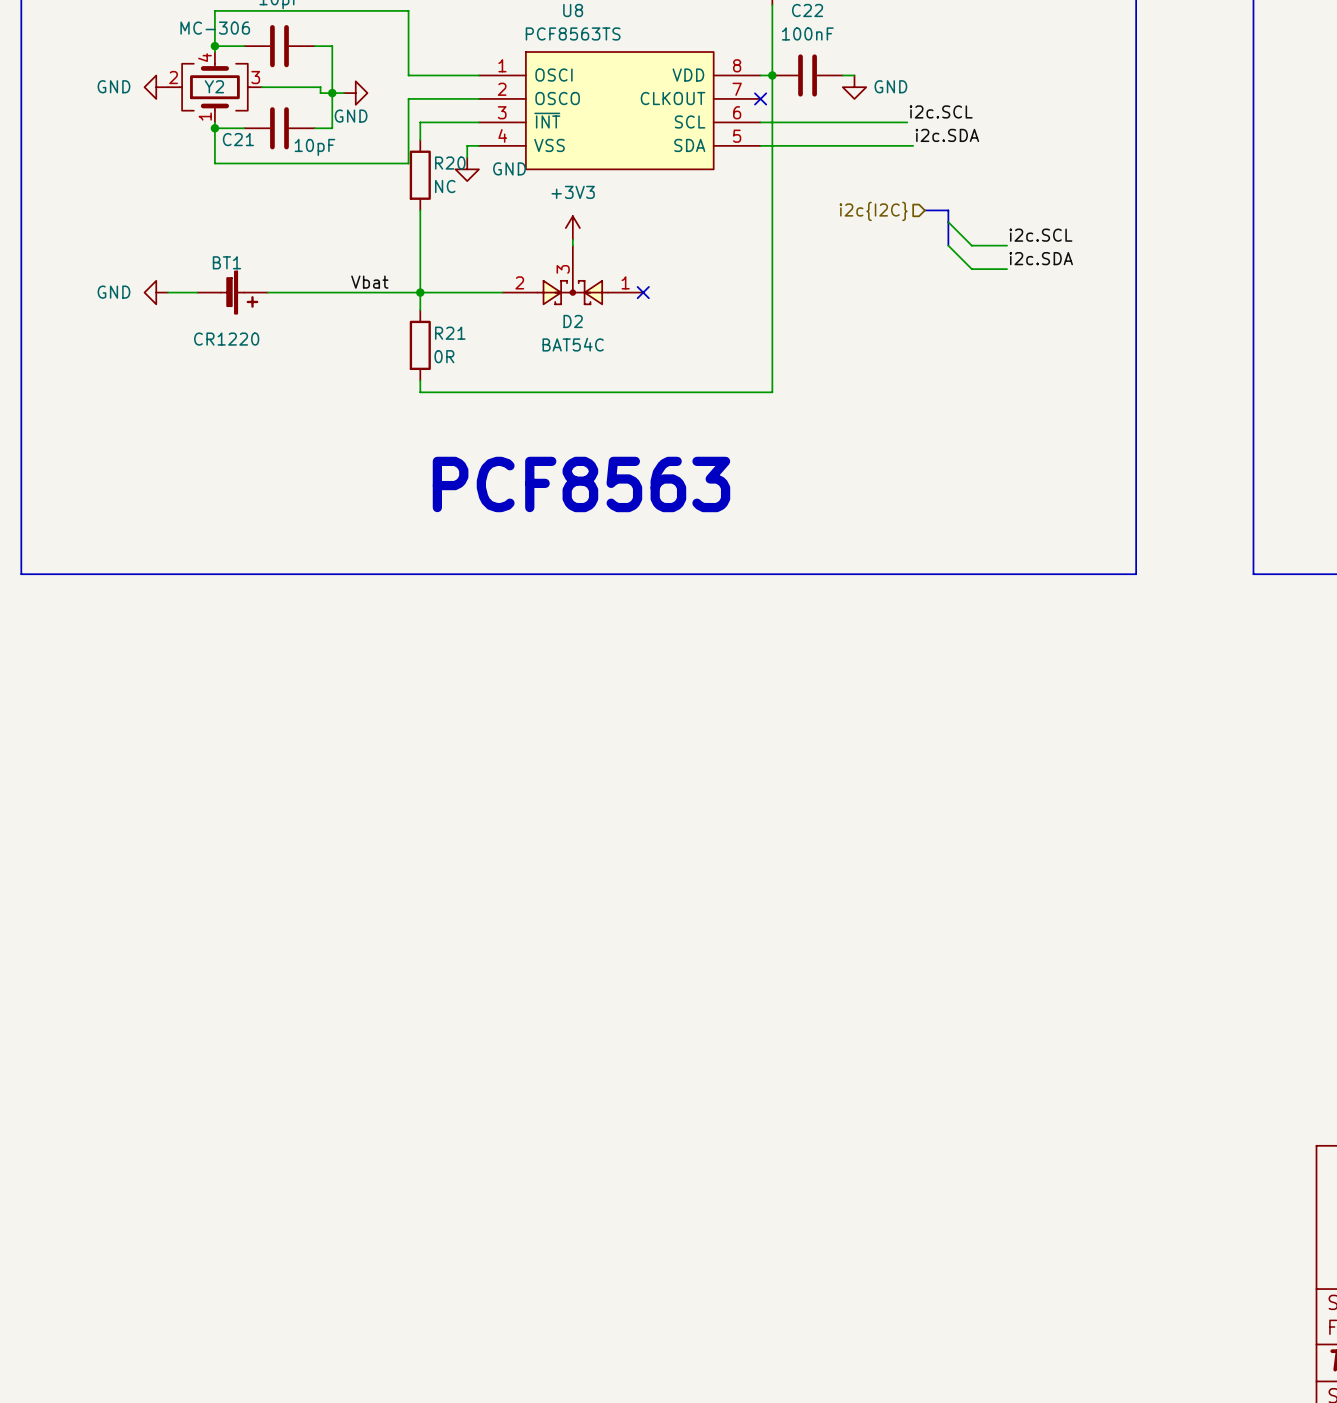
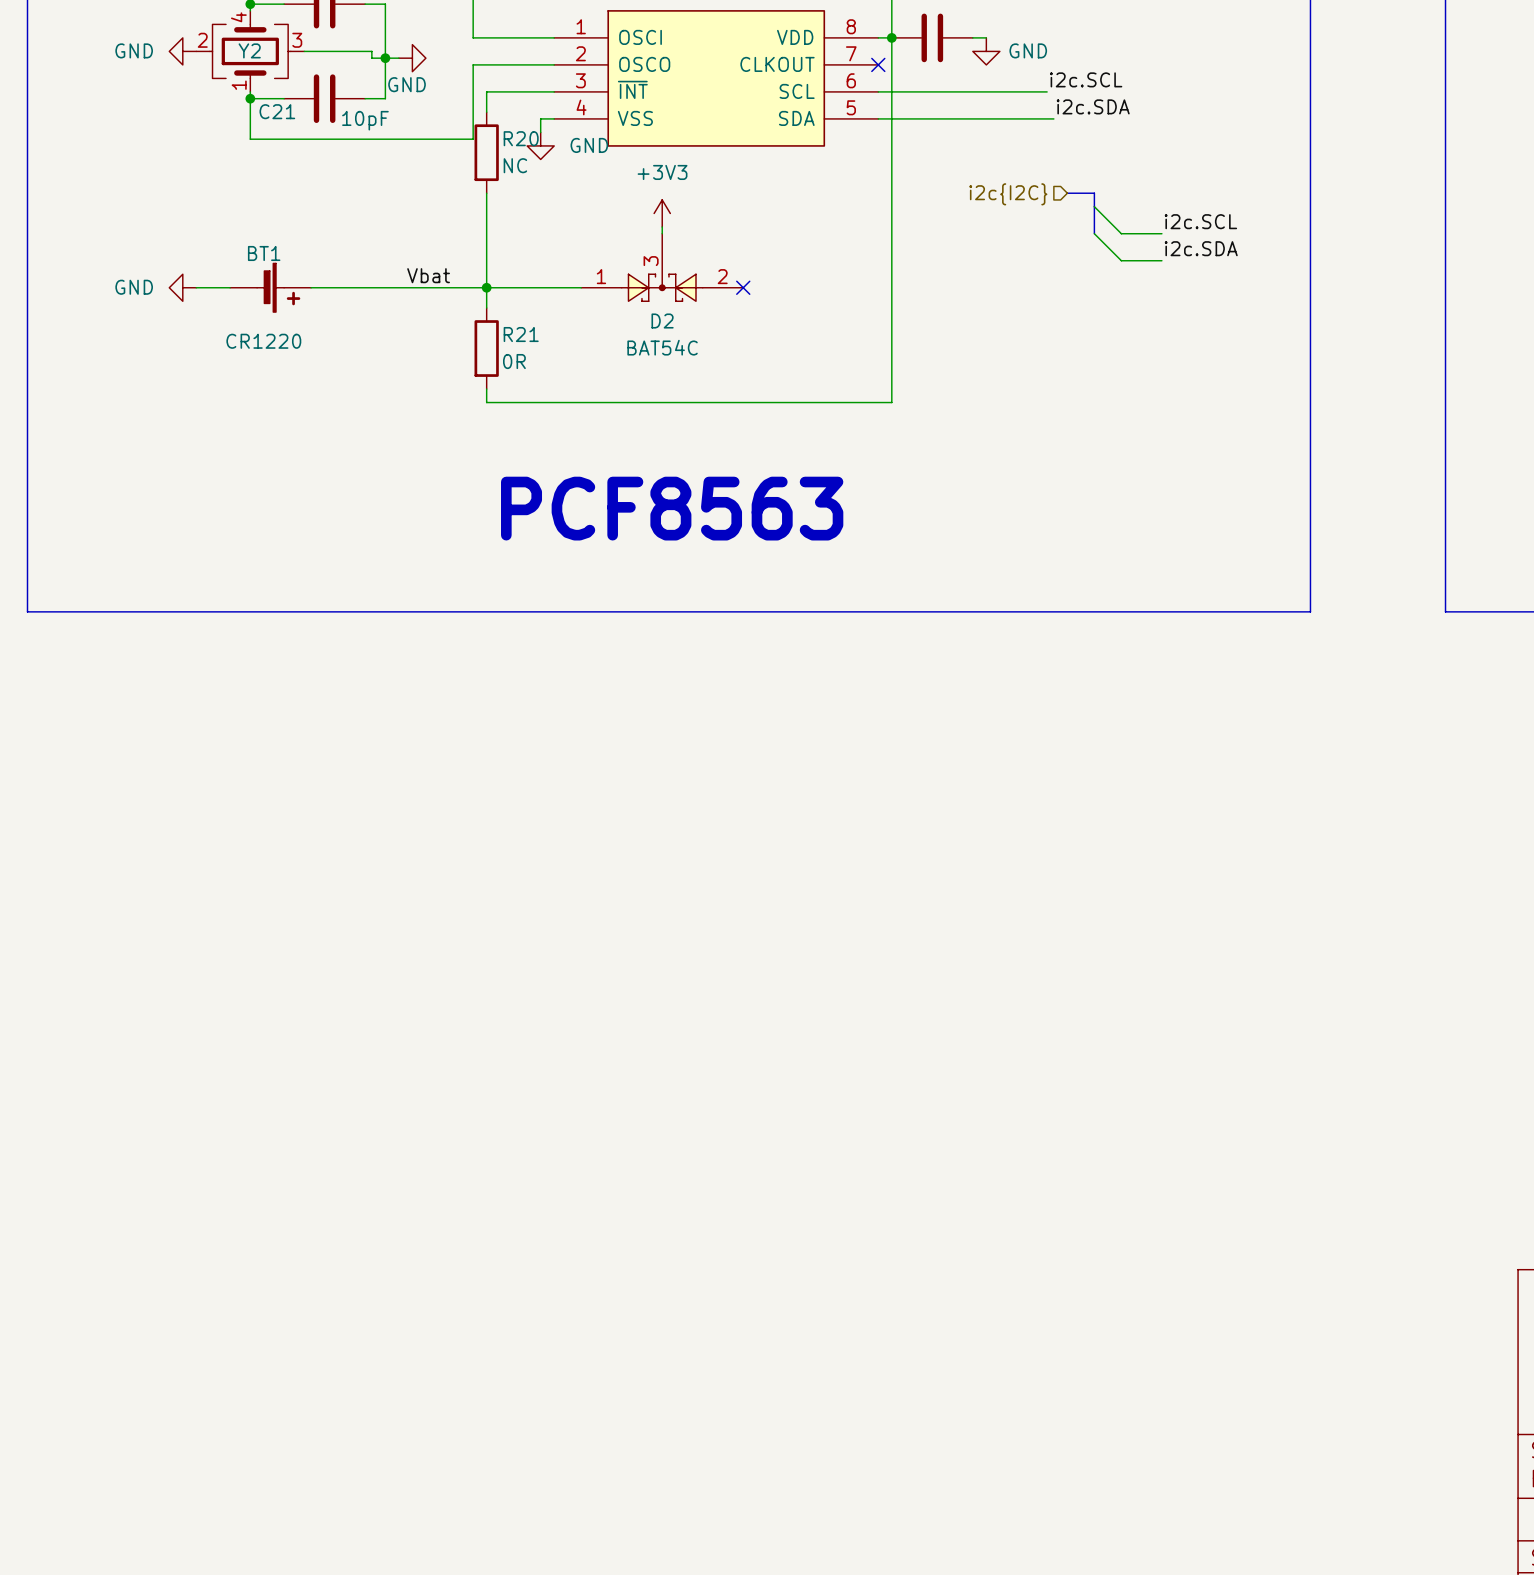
D2 flip: as is (572, 292) -> left-right (662, 287)

